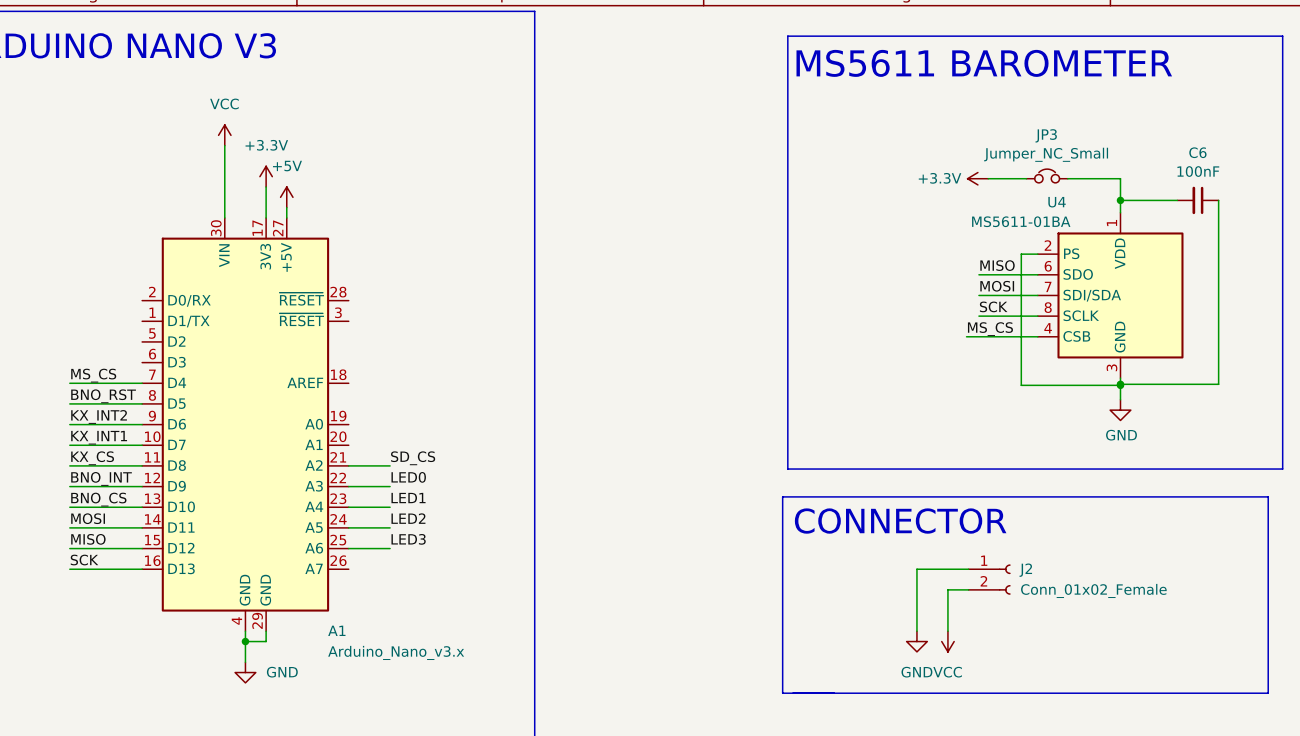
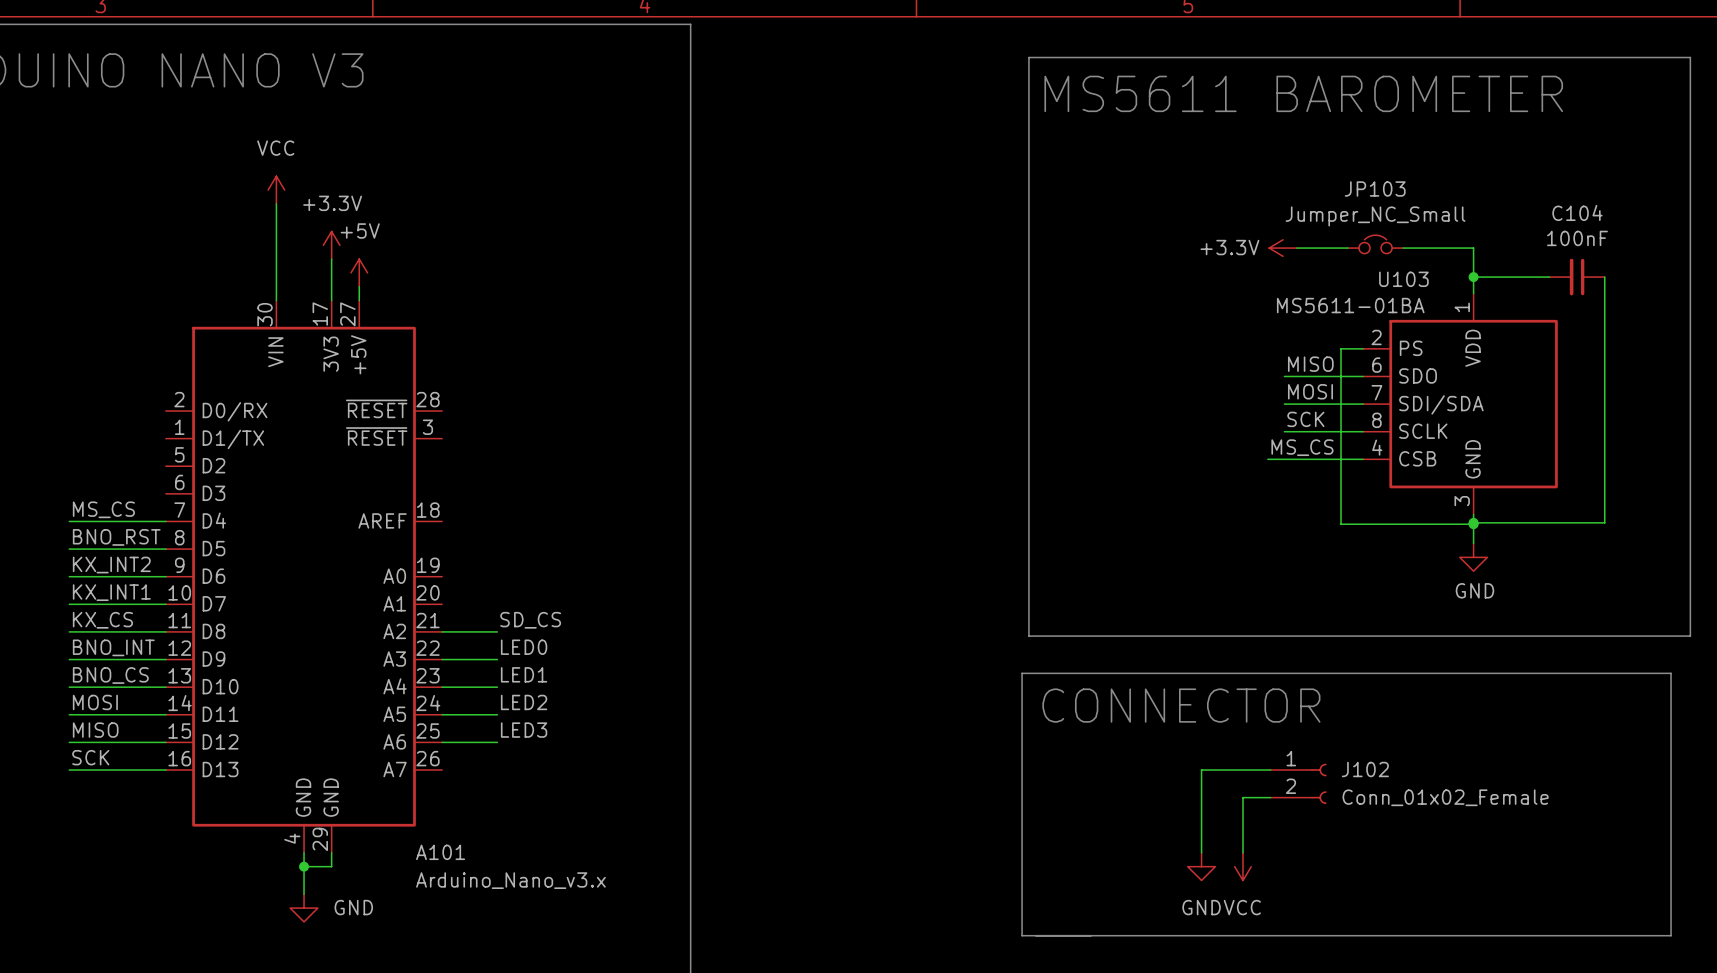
JP3 name: JP3 (1046, 135) -> JP103 (1375, 189)
C6 name: C6 (1197, 152) -> C104 (1577, 212)
U4 name: U4 (1057, 202) -> U103 (1403, 279)
J2 name: J2 (1025, 570) -> J102 (1365, 769)
A1 name: A1 (336, 630) -> A101 (440, 852)

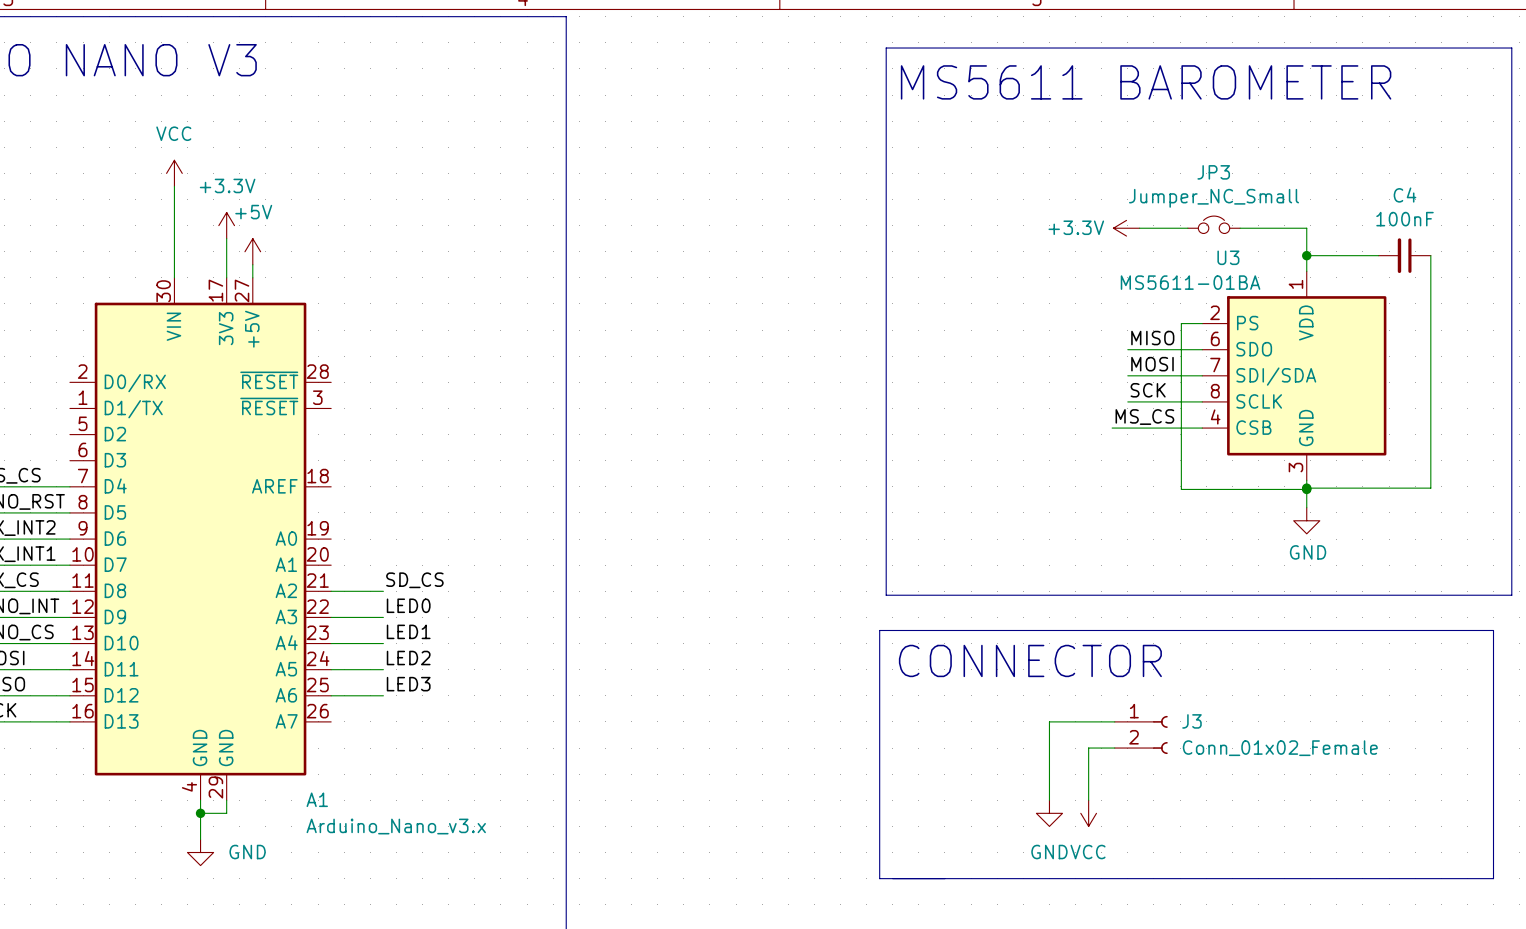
JP103 name: JP103 (1375, 189) -> JP3 (1213, 172)
C104 name: C104 (1577, 212) -> C4 (1405, 195)
U103 name: U103 (1403, 279) -> U3 (1228, 257)
J102 name: J102 (1365, 769) -> J3 (1191, 721)
A101 name: A101 (440, 852) -> A1 (317, 799)

